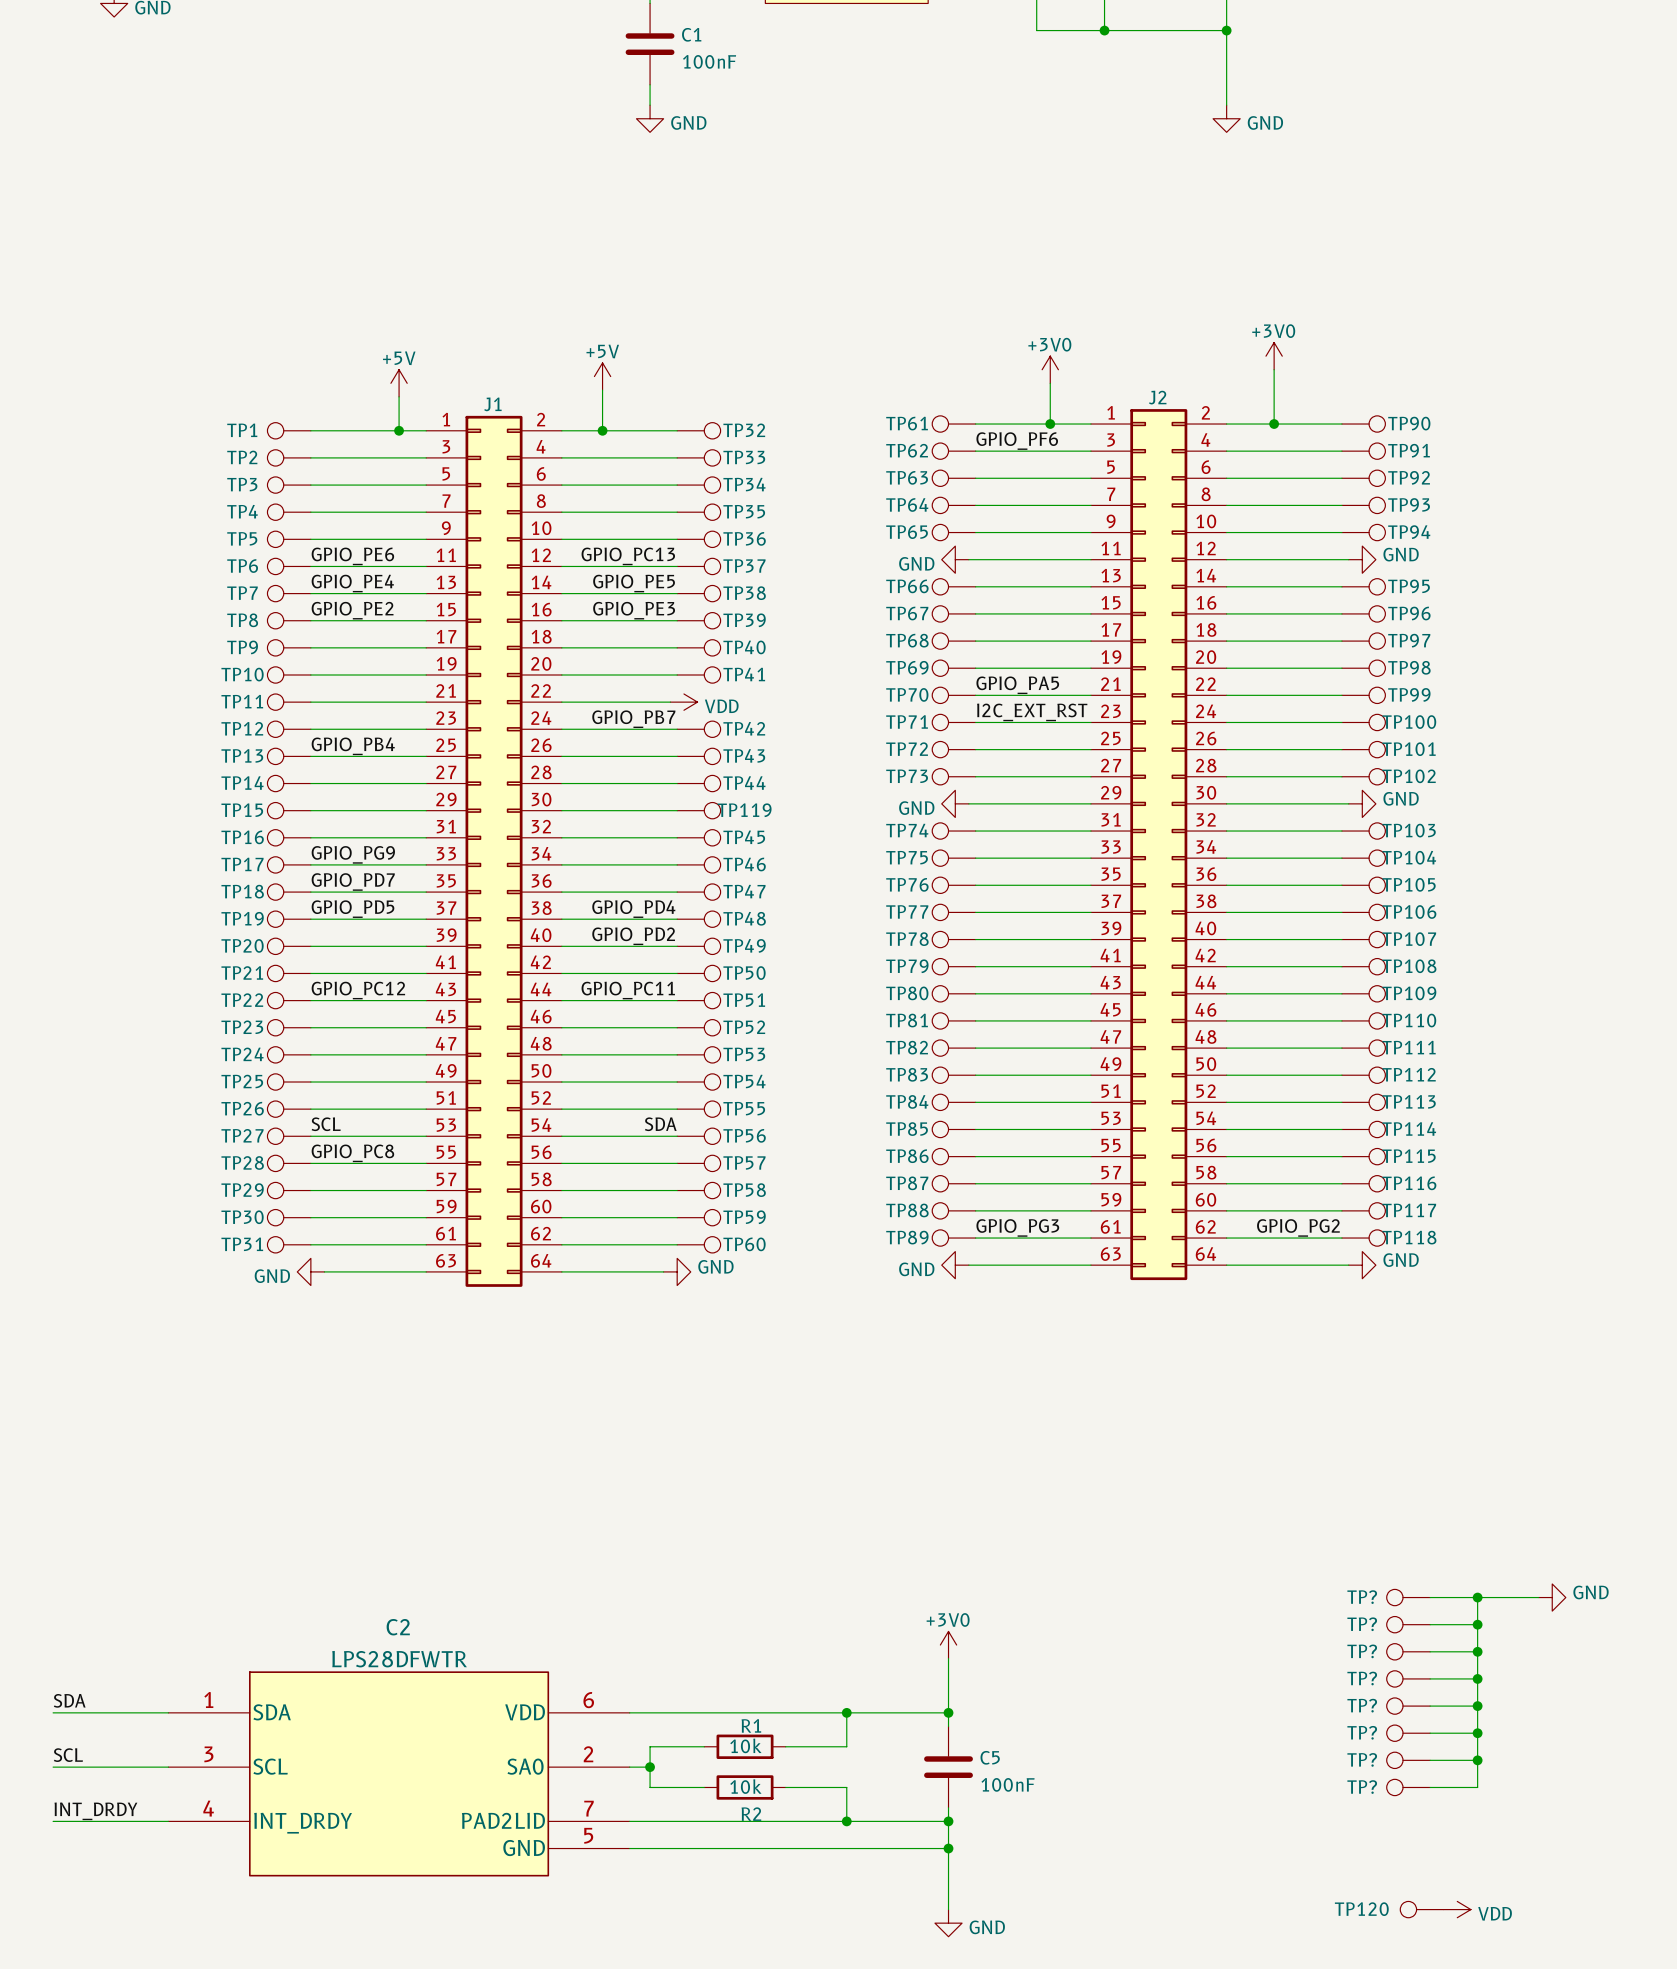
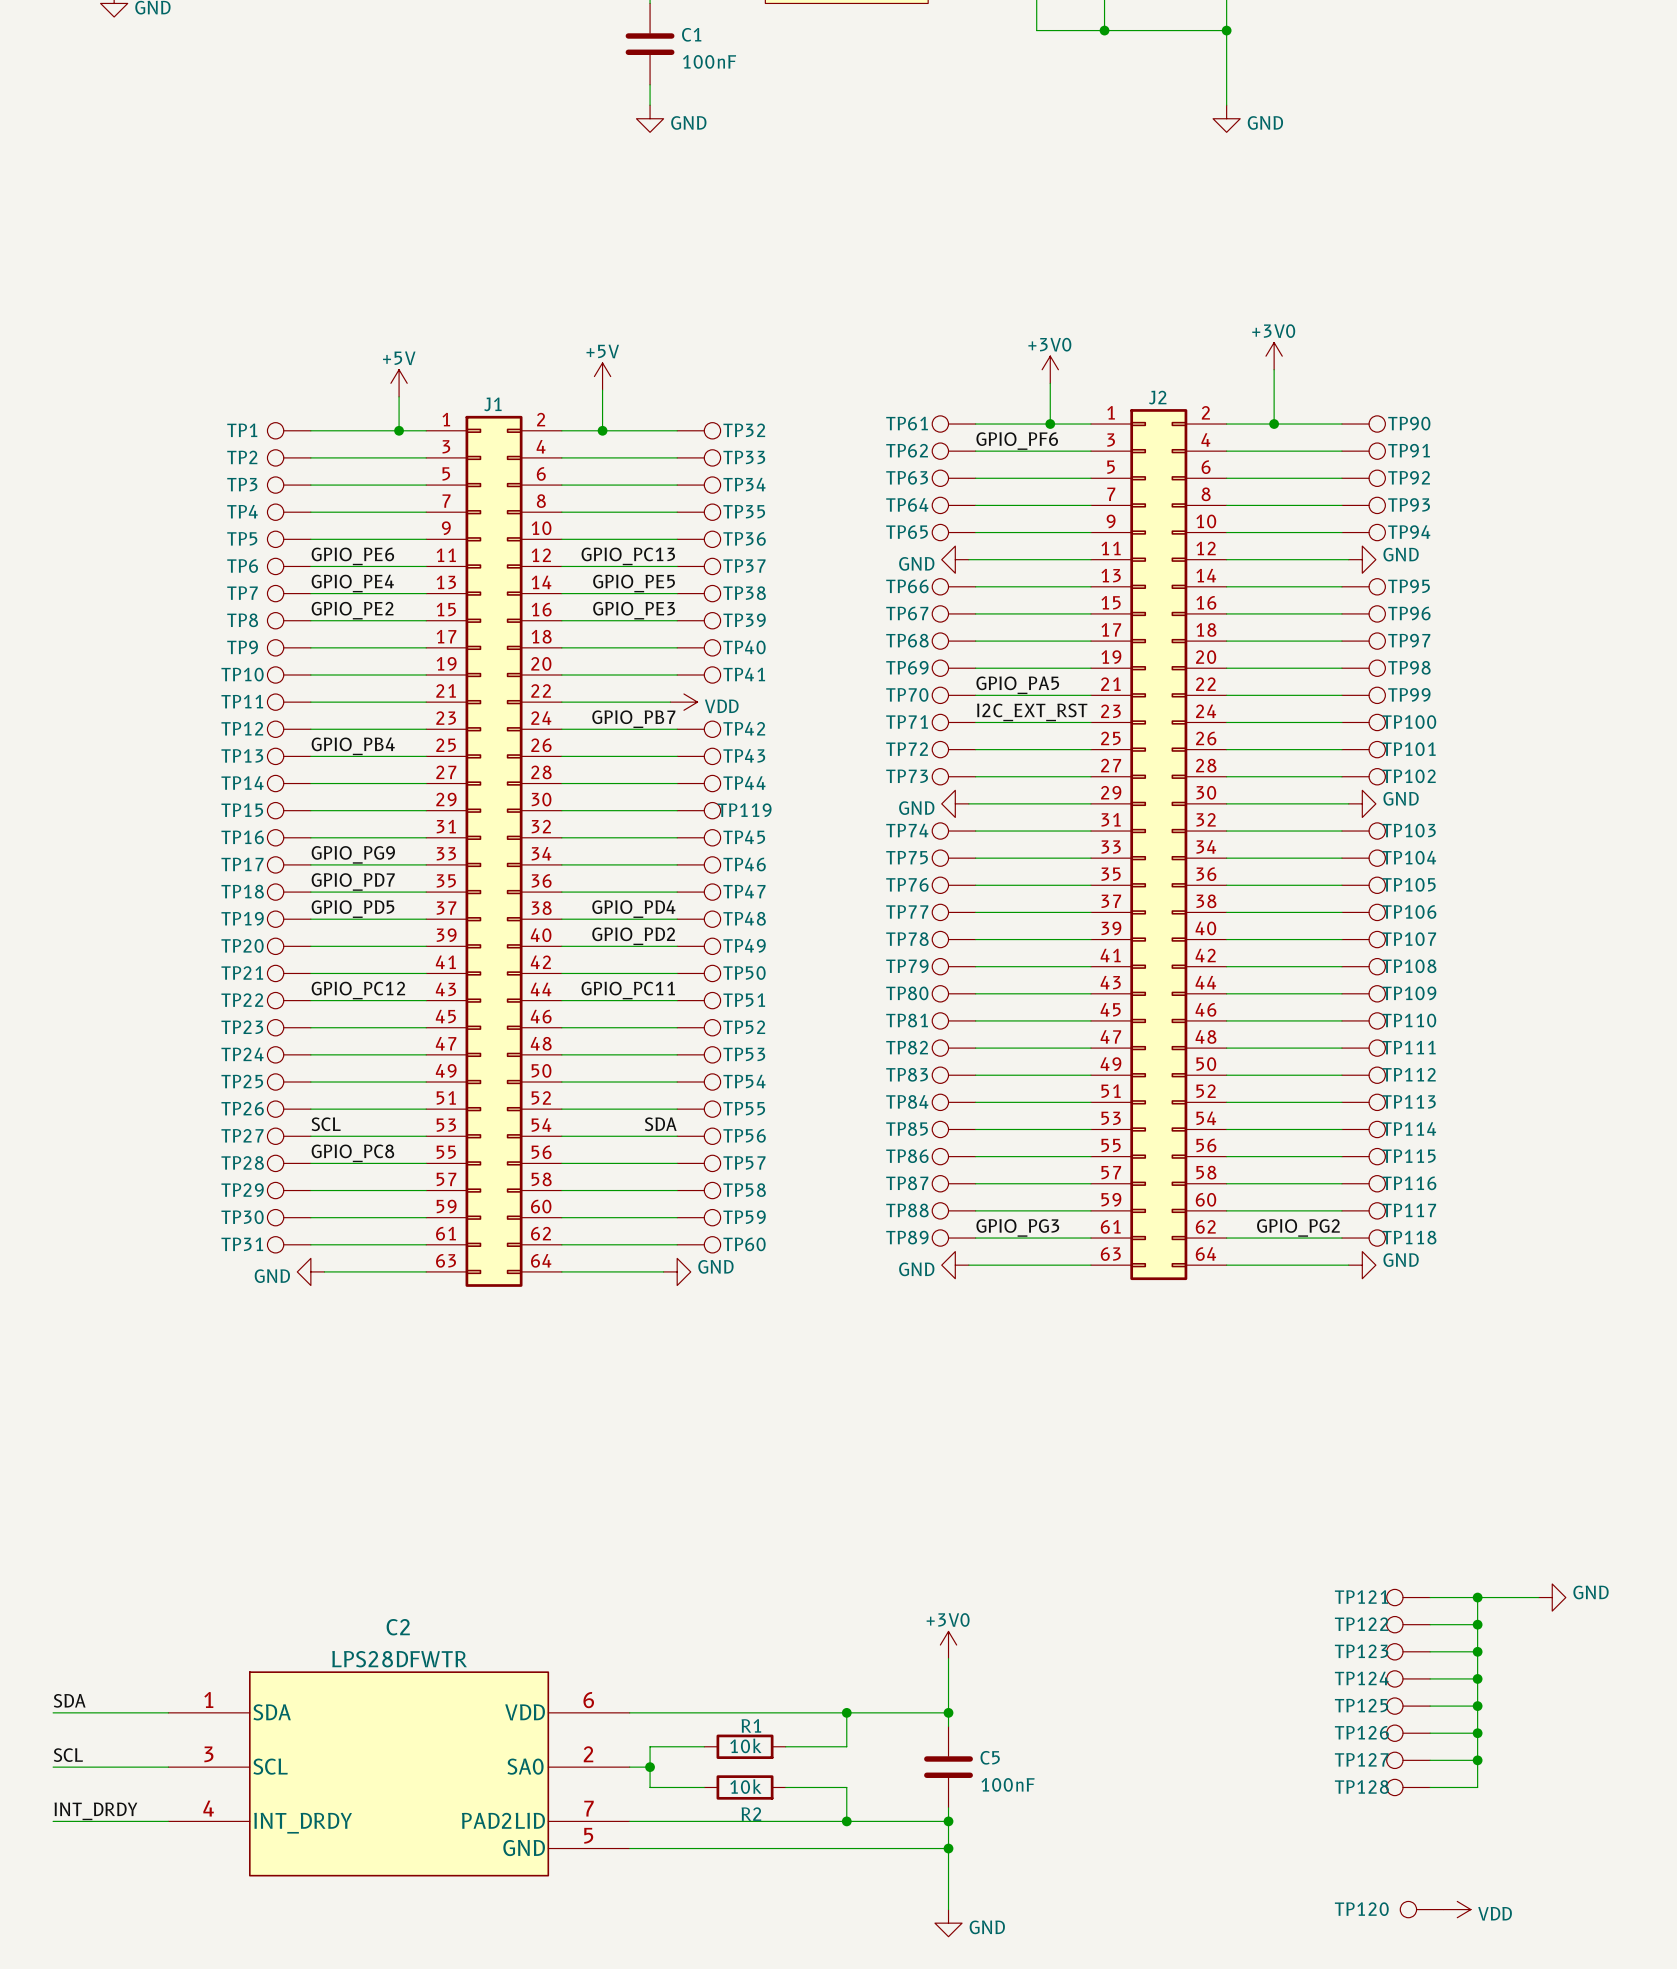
TP? name: TP? (1362, 1597) -> TP121 (1361, 1597)
TP? name: TP? (1362, 1624) -> TP122 (1361, 1624)
TP? name: TP? (1362, 1651) -> TP123 (1361, 1651)
TP? name: TP? (1362, 1678) -> TP124 (1361, 1678)
TP? name: TP? (1362, 1705) -> TP125 (1361, 1705)
TP? name: TP? (1362, 1732) -> TP126 (1361, 1732)
TP? name: TP? (1362, 1759) -> TP127 (1361, 1759)
TP? name: TP? (1362, 1787) -> TP128 (1361, 1787)

